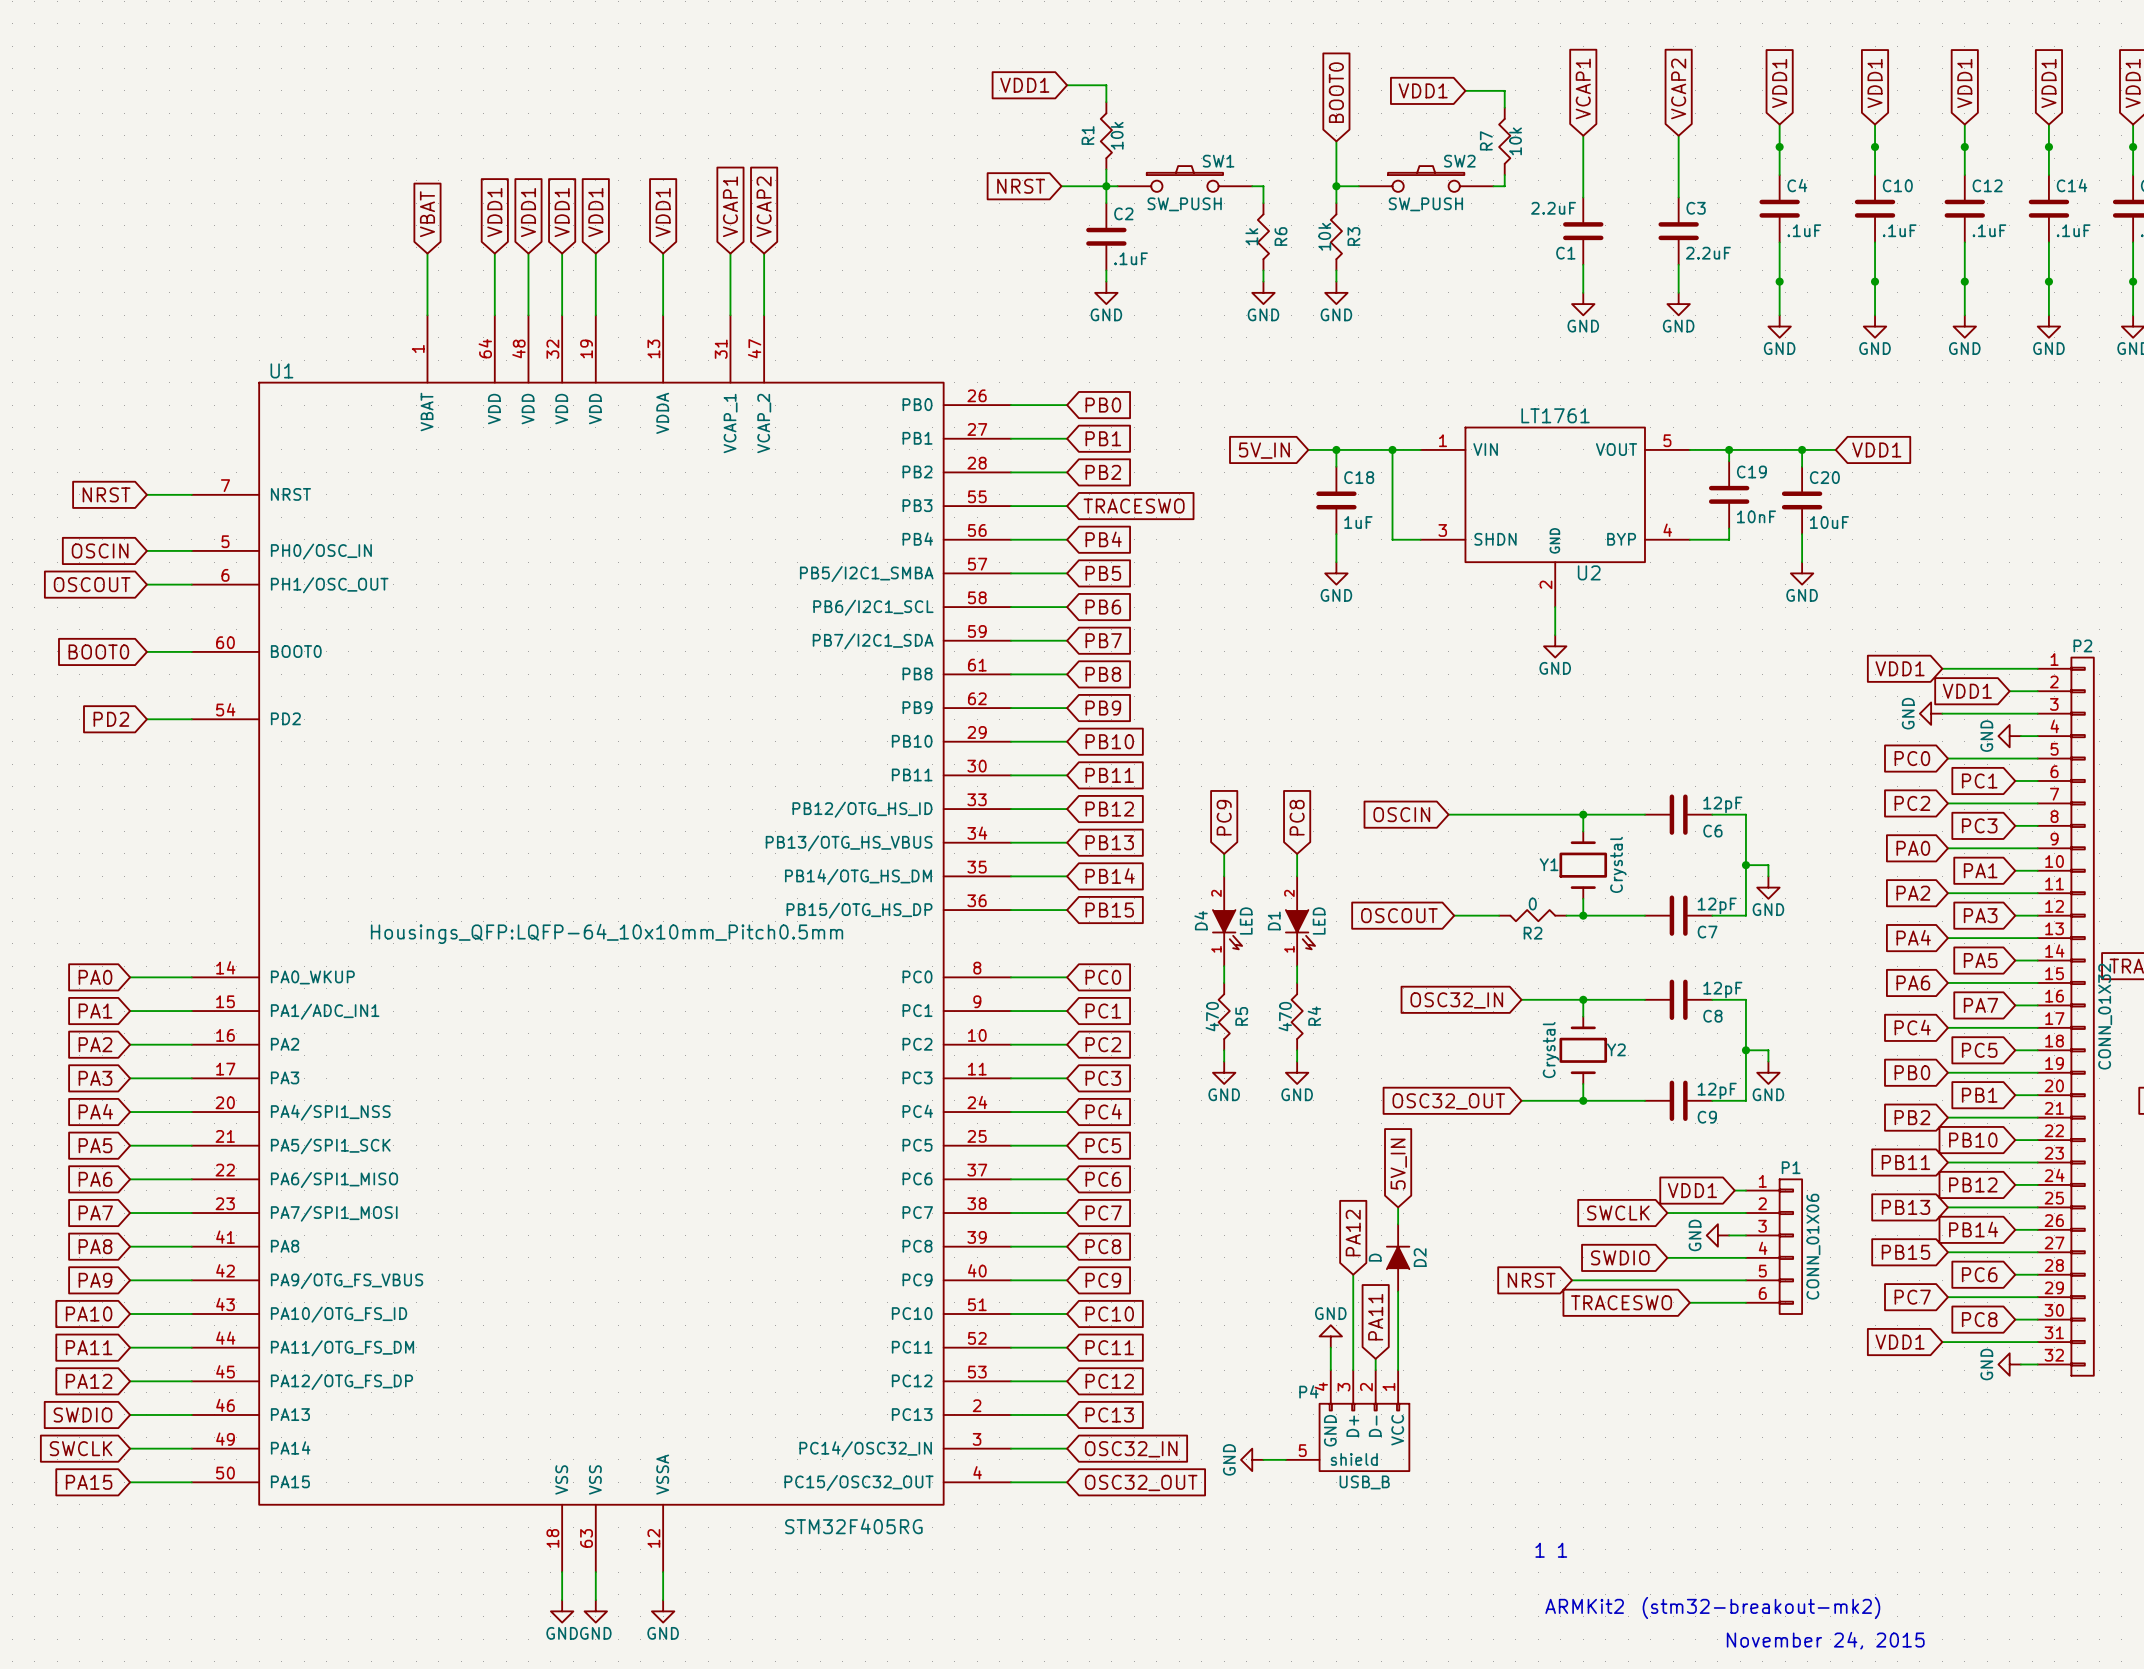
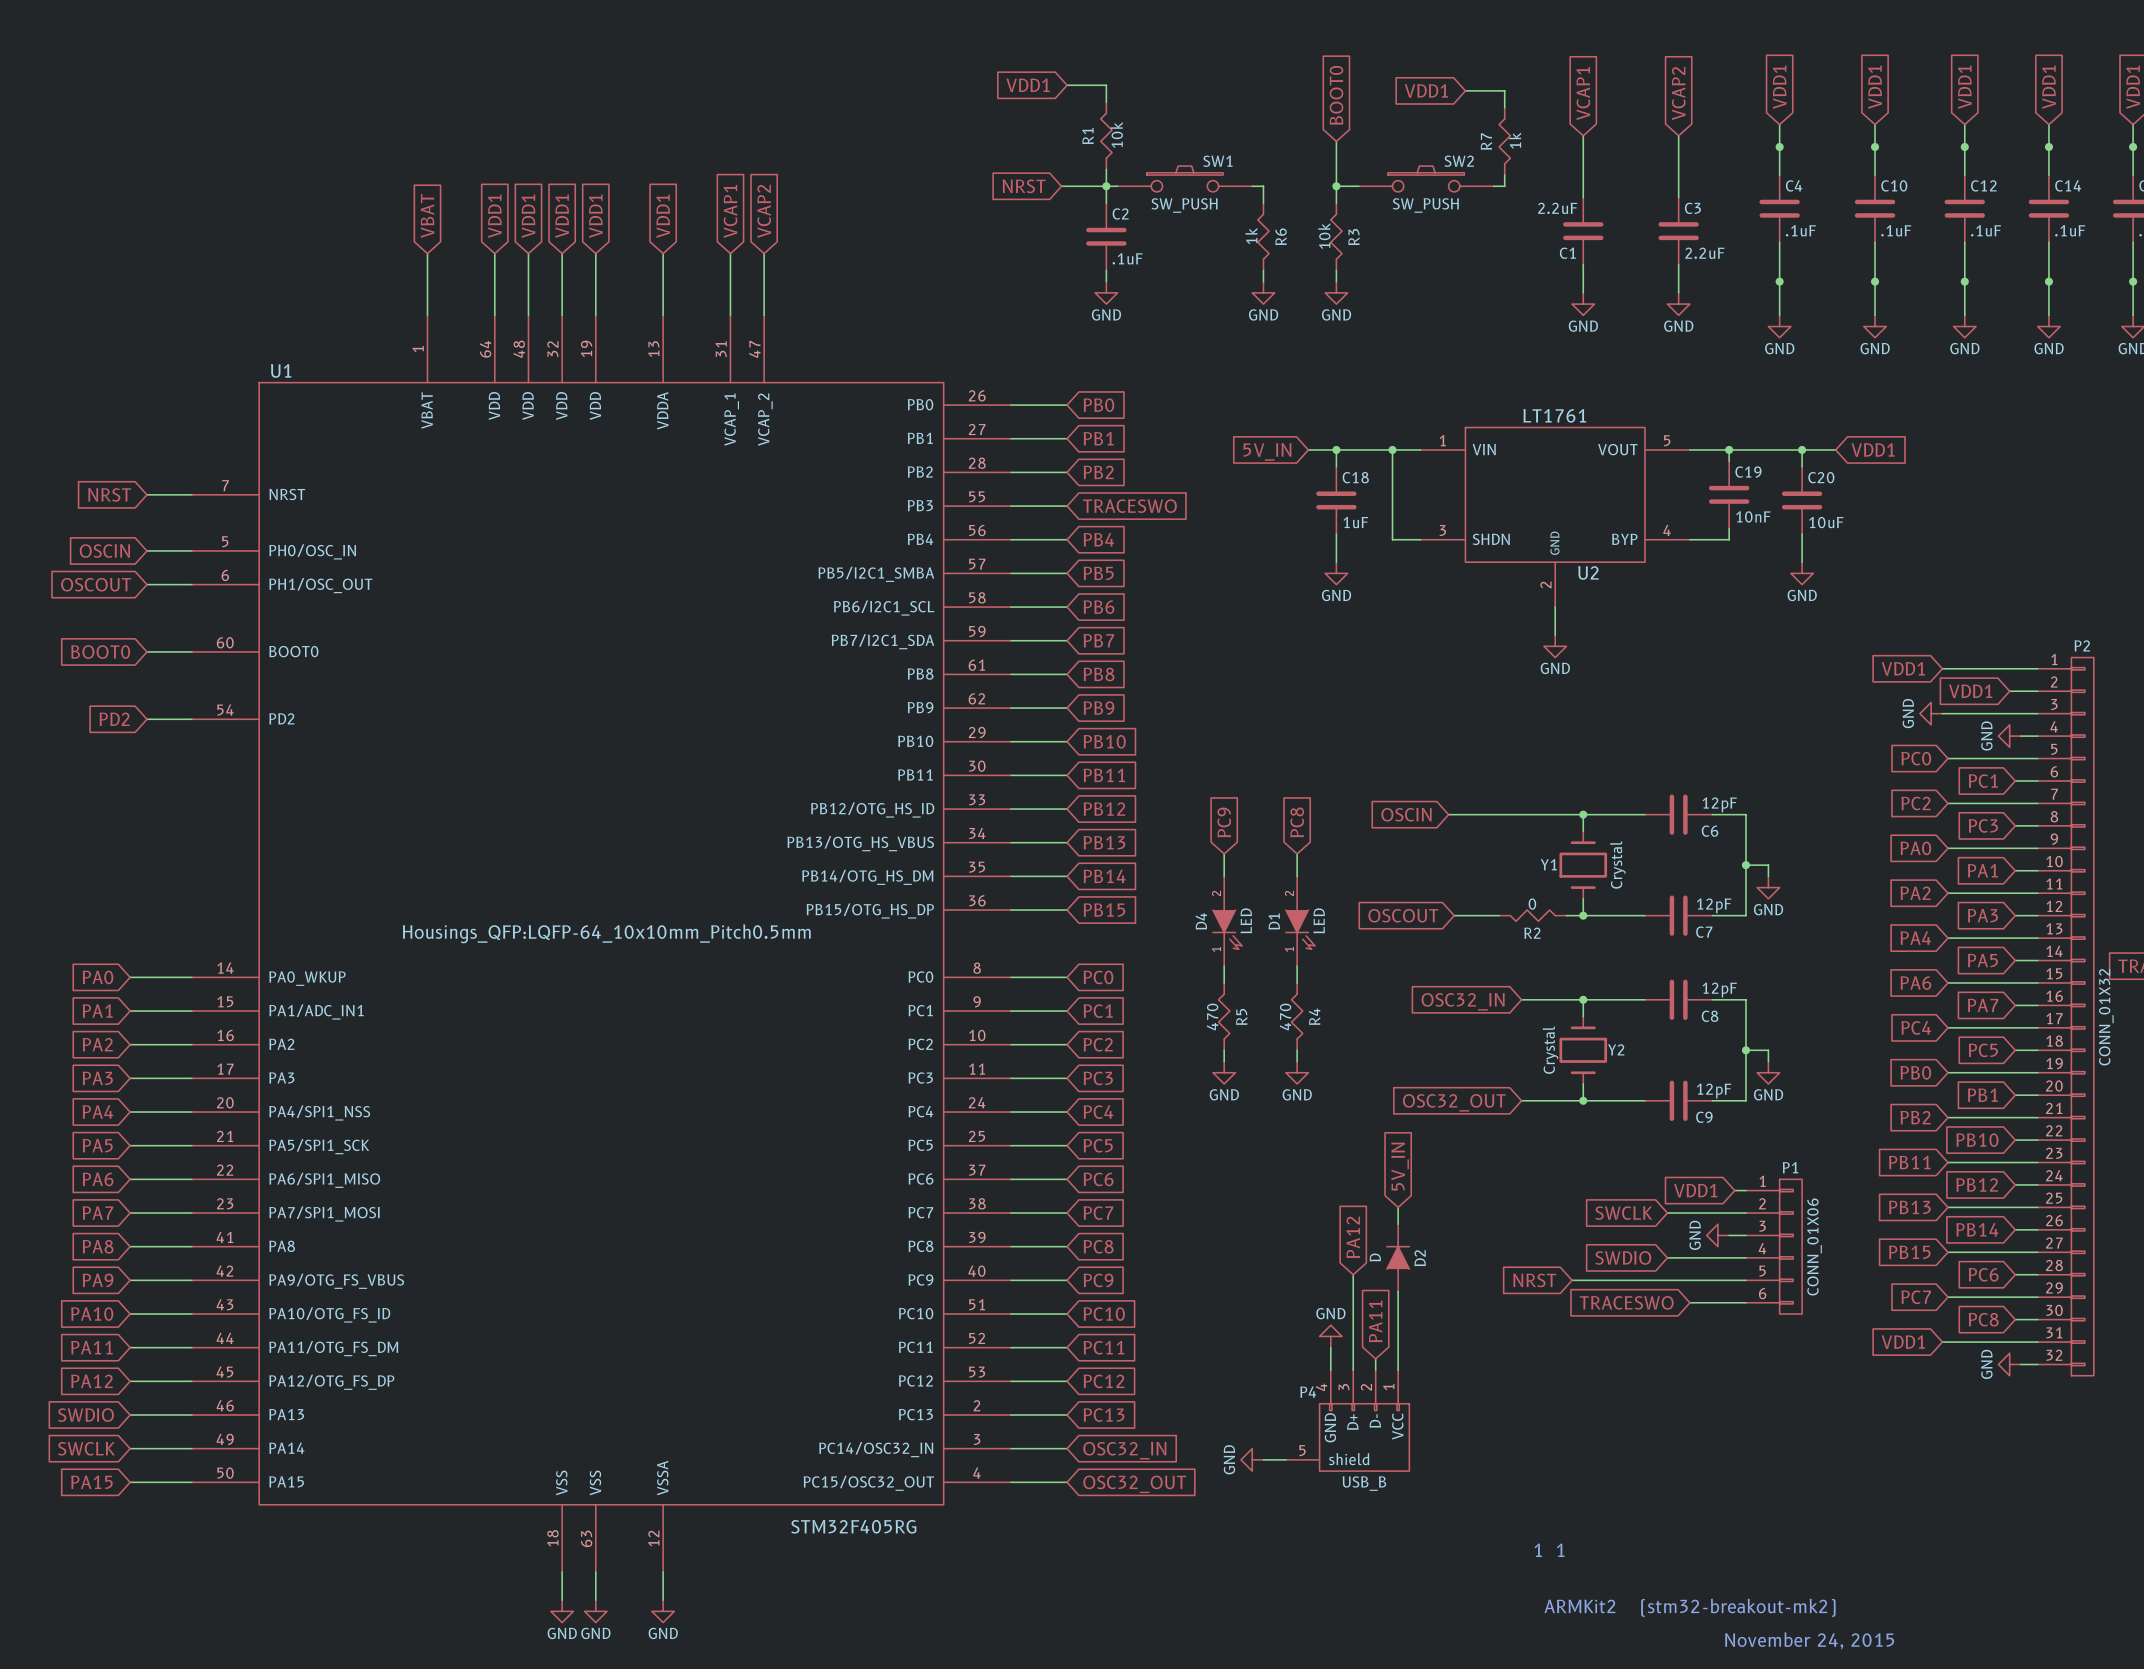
R7 value: 10k (1515, 141) -> 1k (1515, 140)

